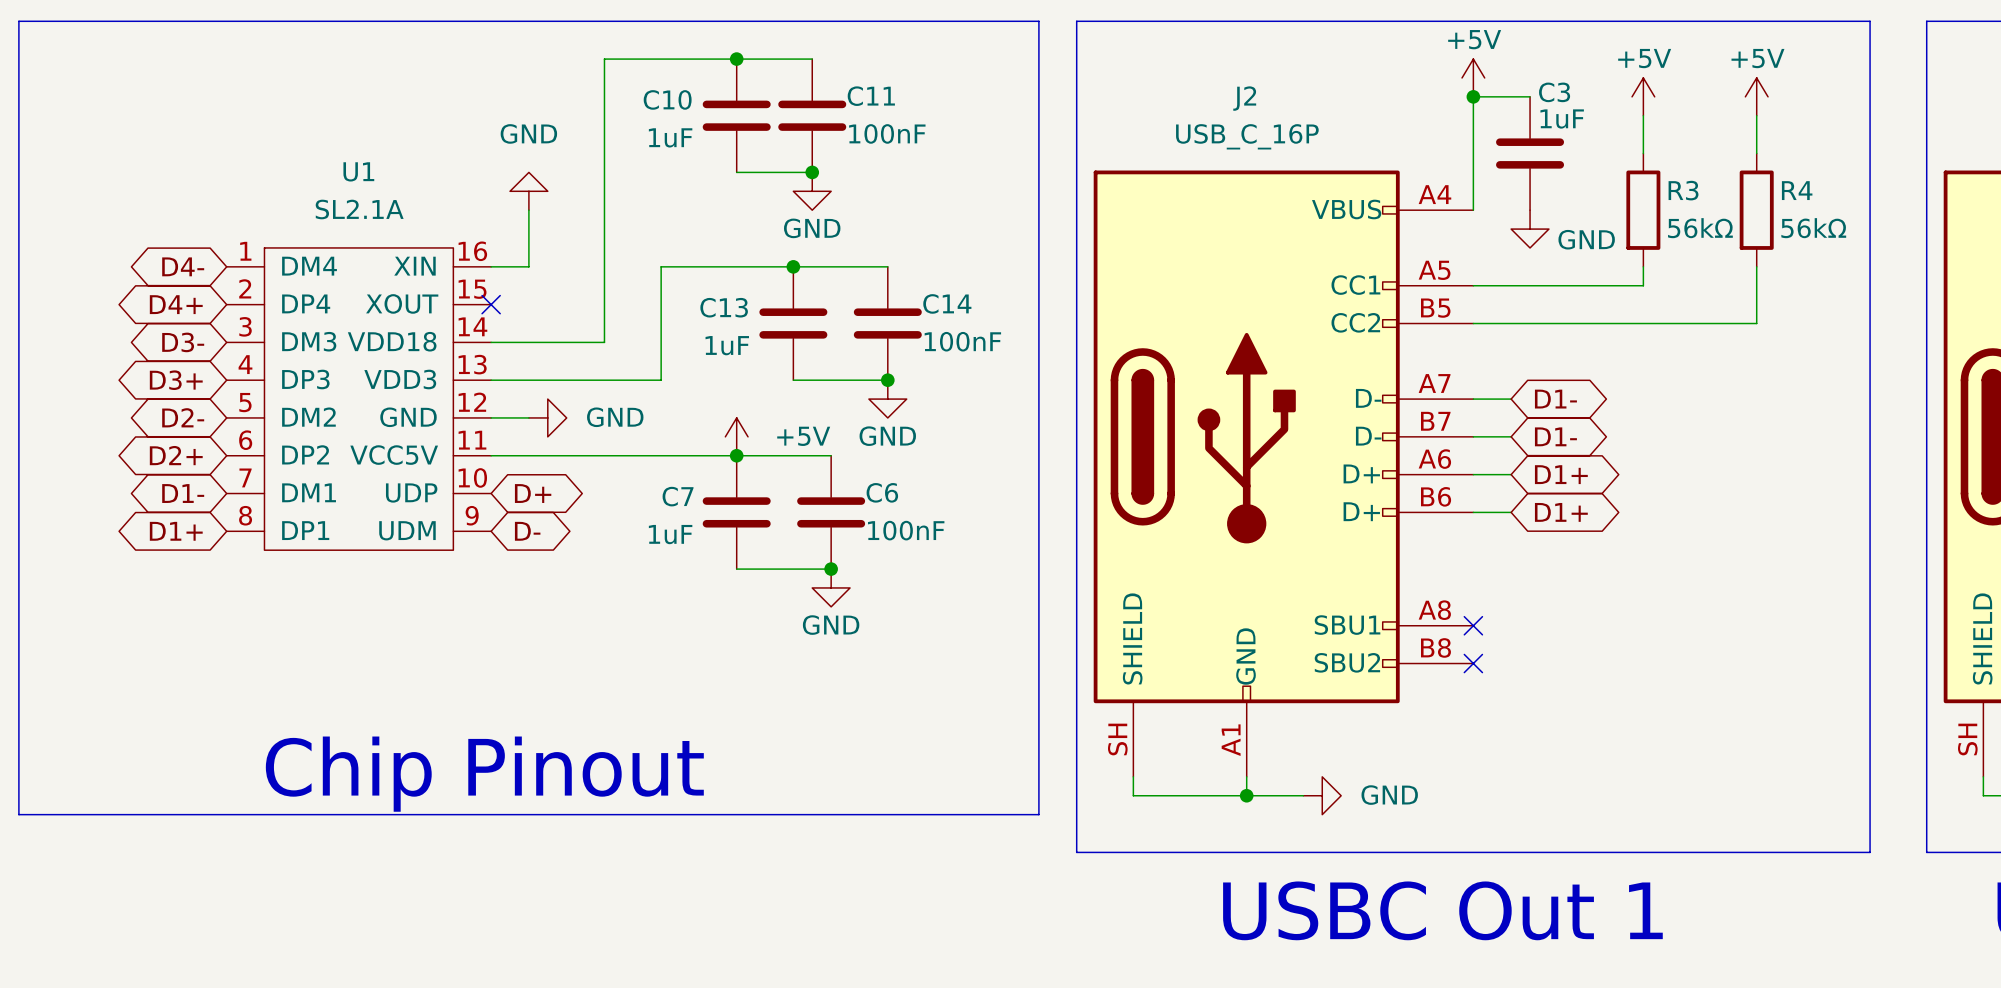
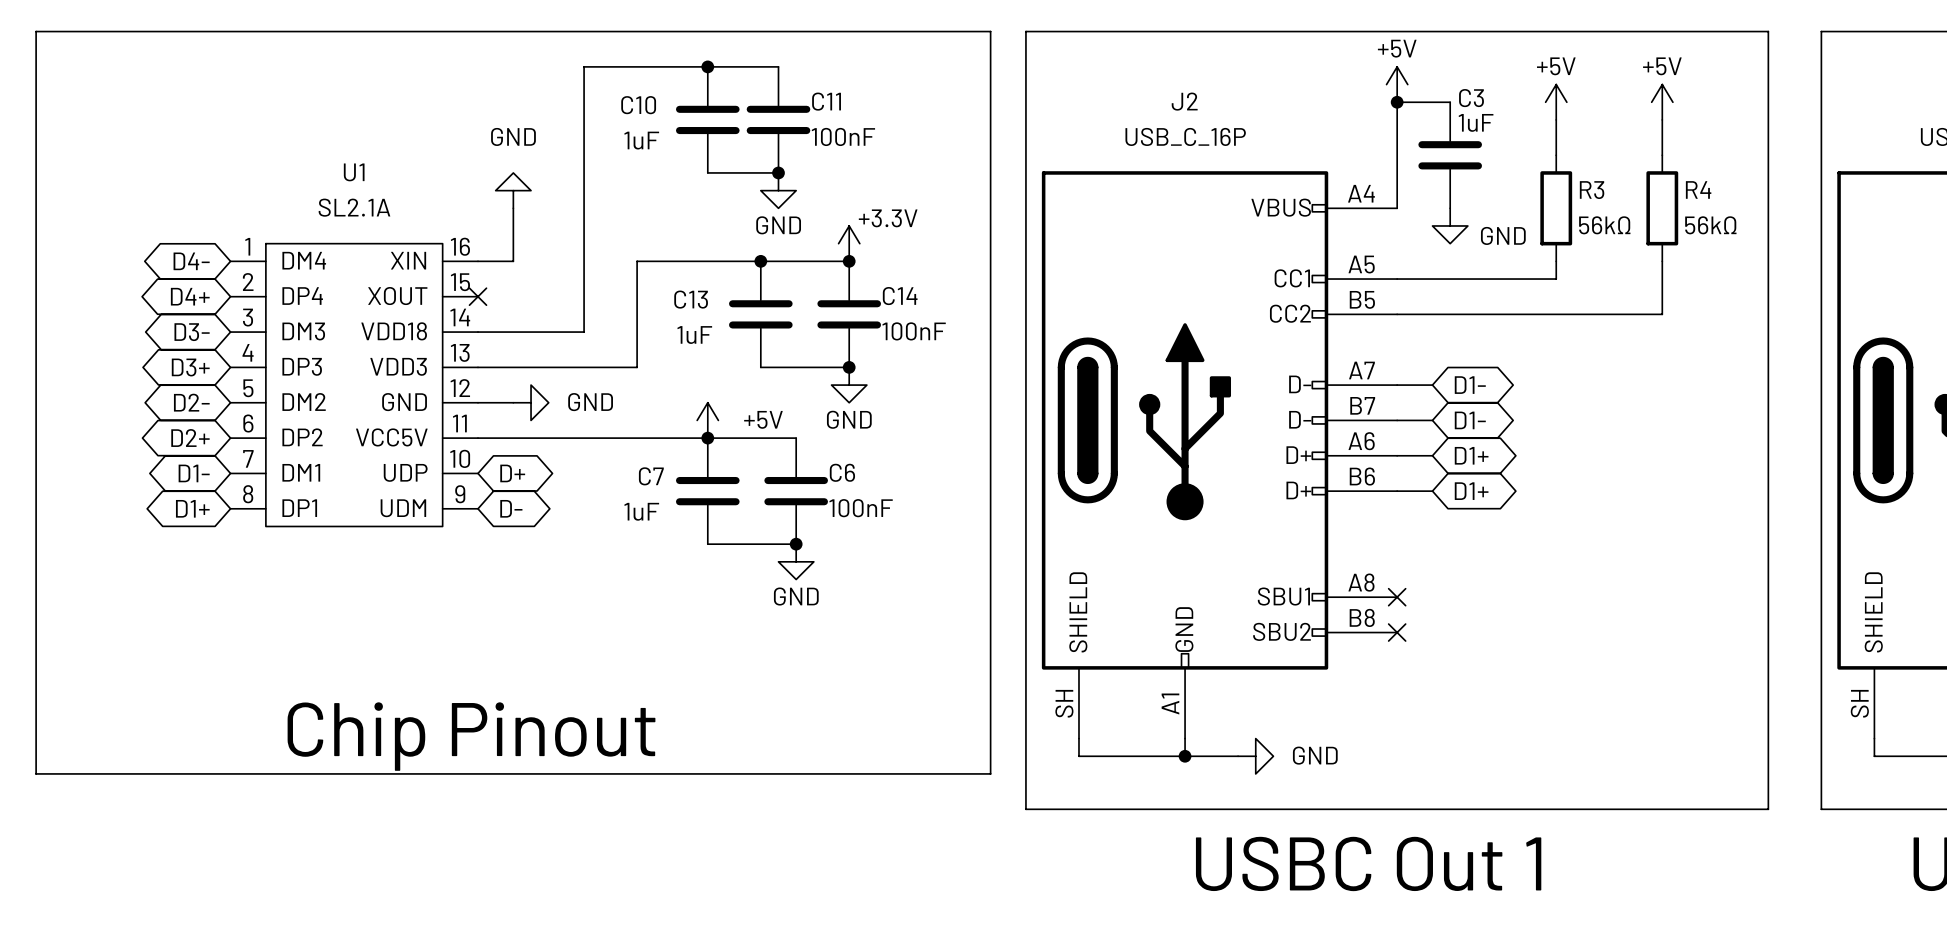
power symbol: none -> +3.3V (849, 243)
junction: none -> (849, 261)

